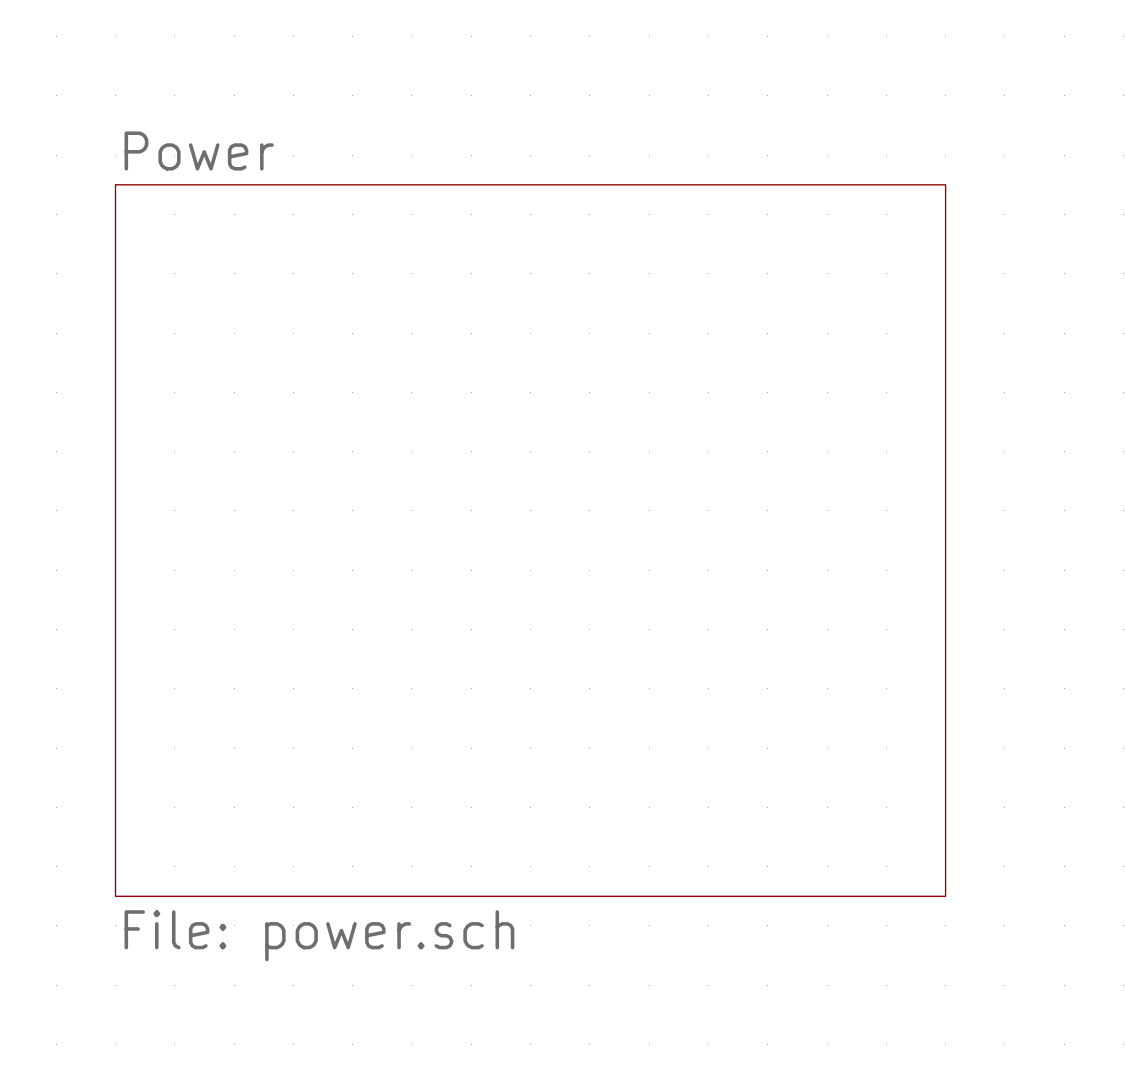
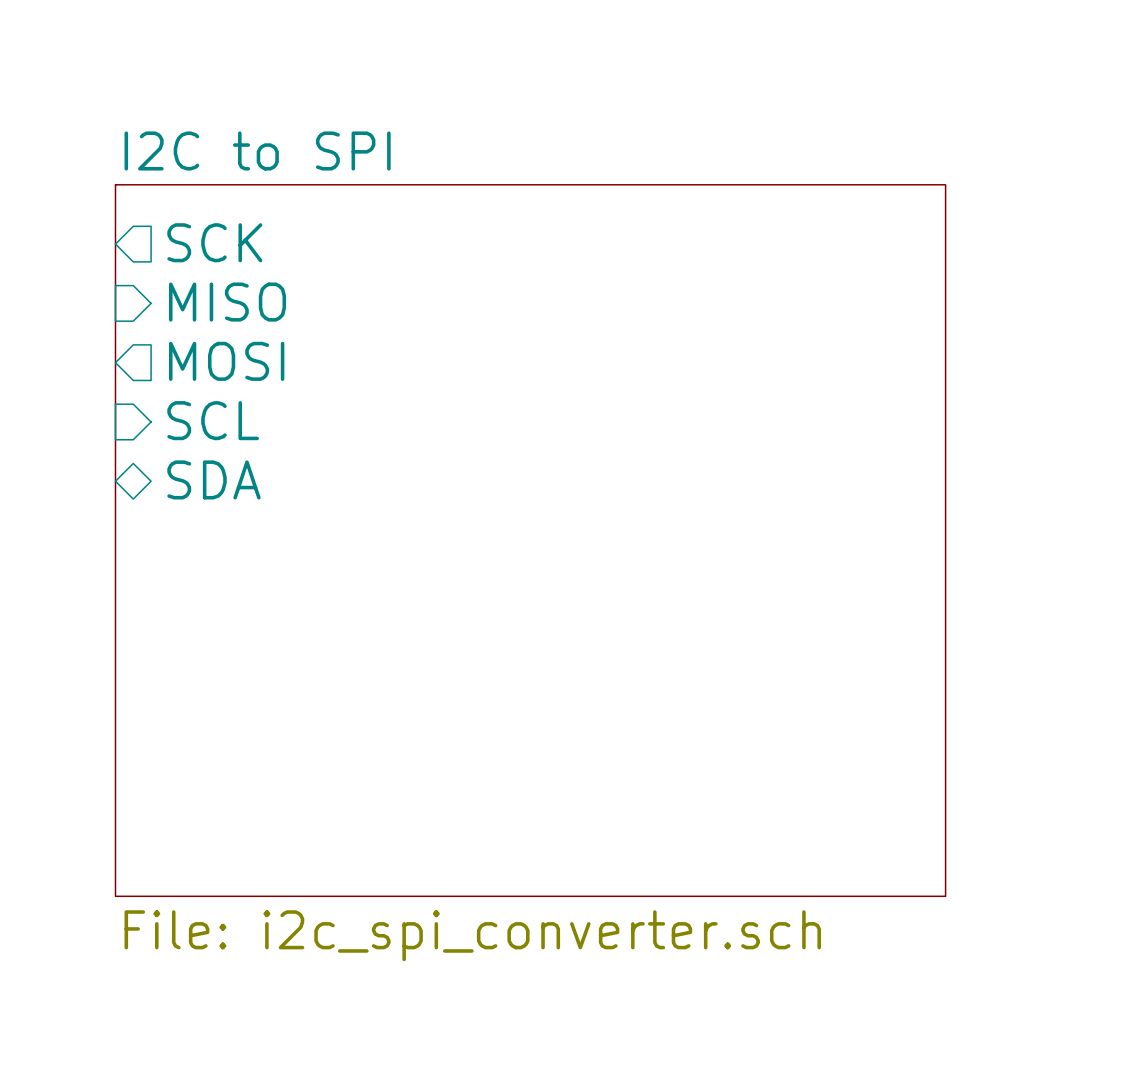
sheet Power name: Power (199, 150) -> I2C to SPI (257, 150)
sheet pin: none -> SCK (214, 242)
sheet pin: none -> MISO (227, 302)
sheet pin: none -> MOSI (226, 361)
sheet pin: none -> SCL (213, 420)
sheet pin: none -> SDA (213, 479)
sheet Power value: File: power.sch (319, 935) -> File: i2c_spi_converter.sch (472, 935)

